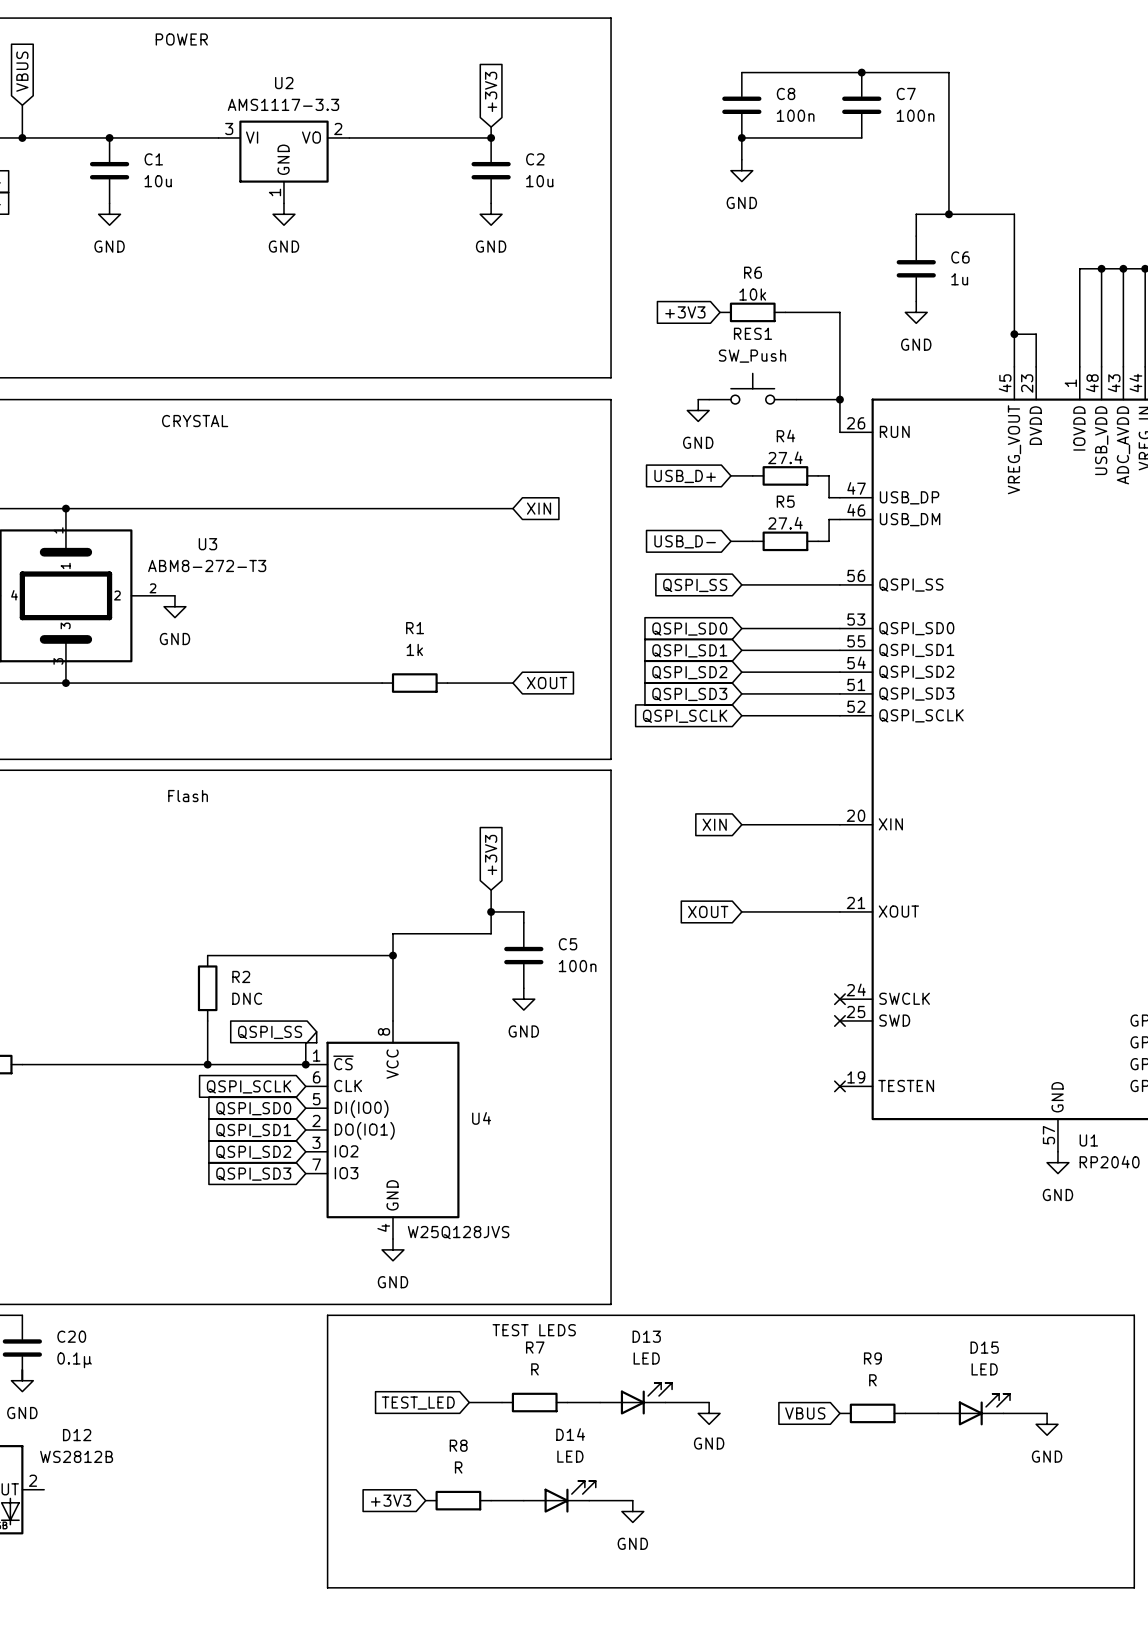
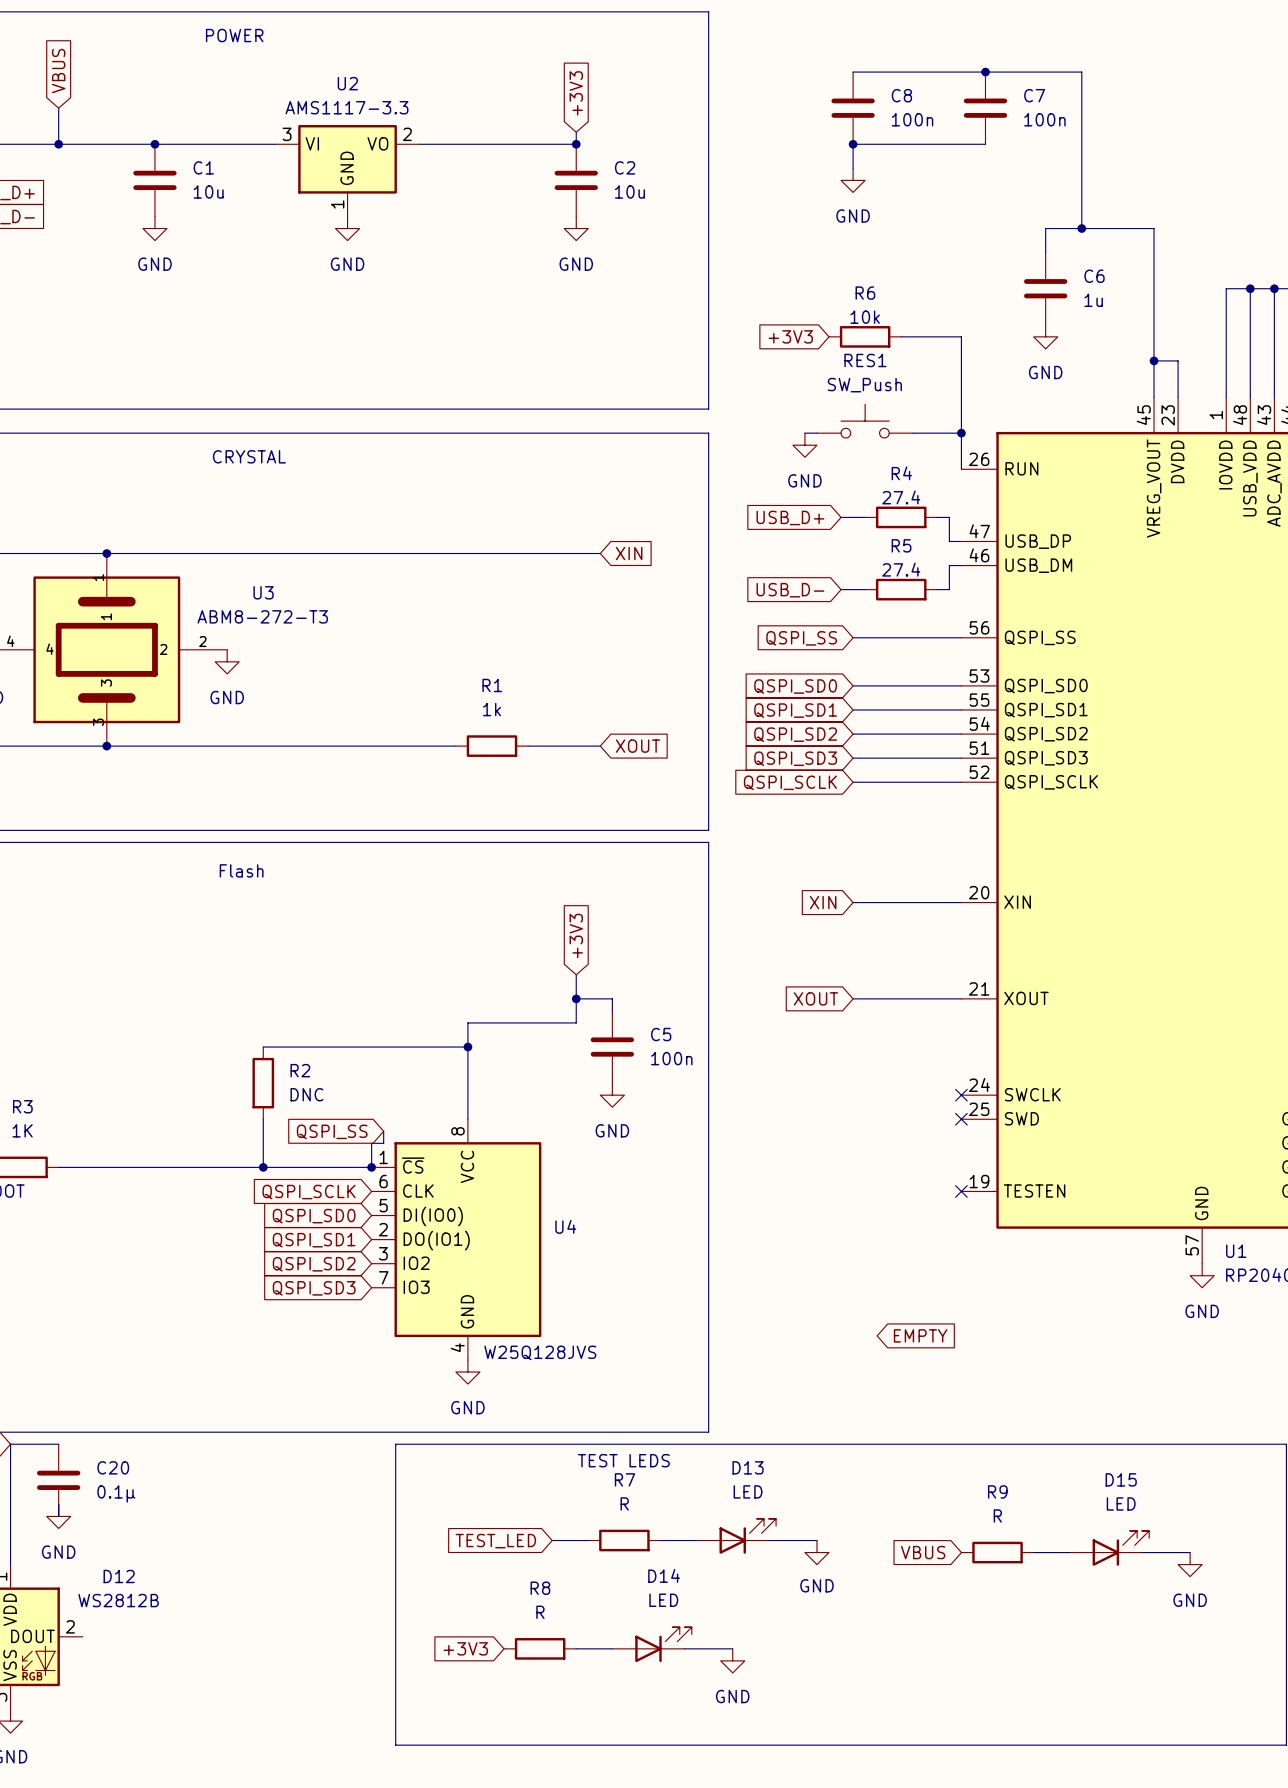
global label: none -> EMPTY (920, 1335)

